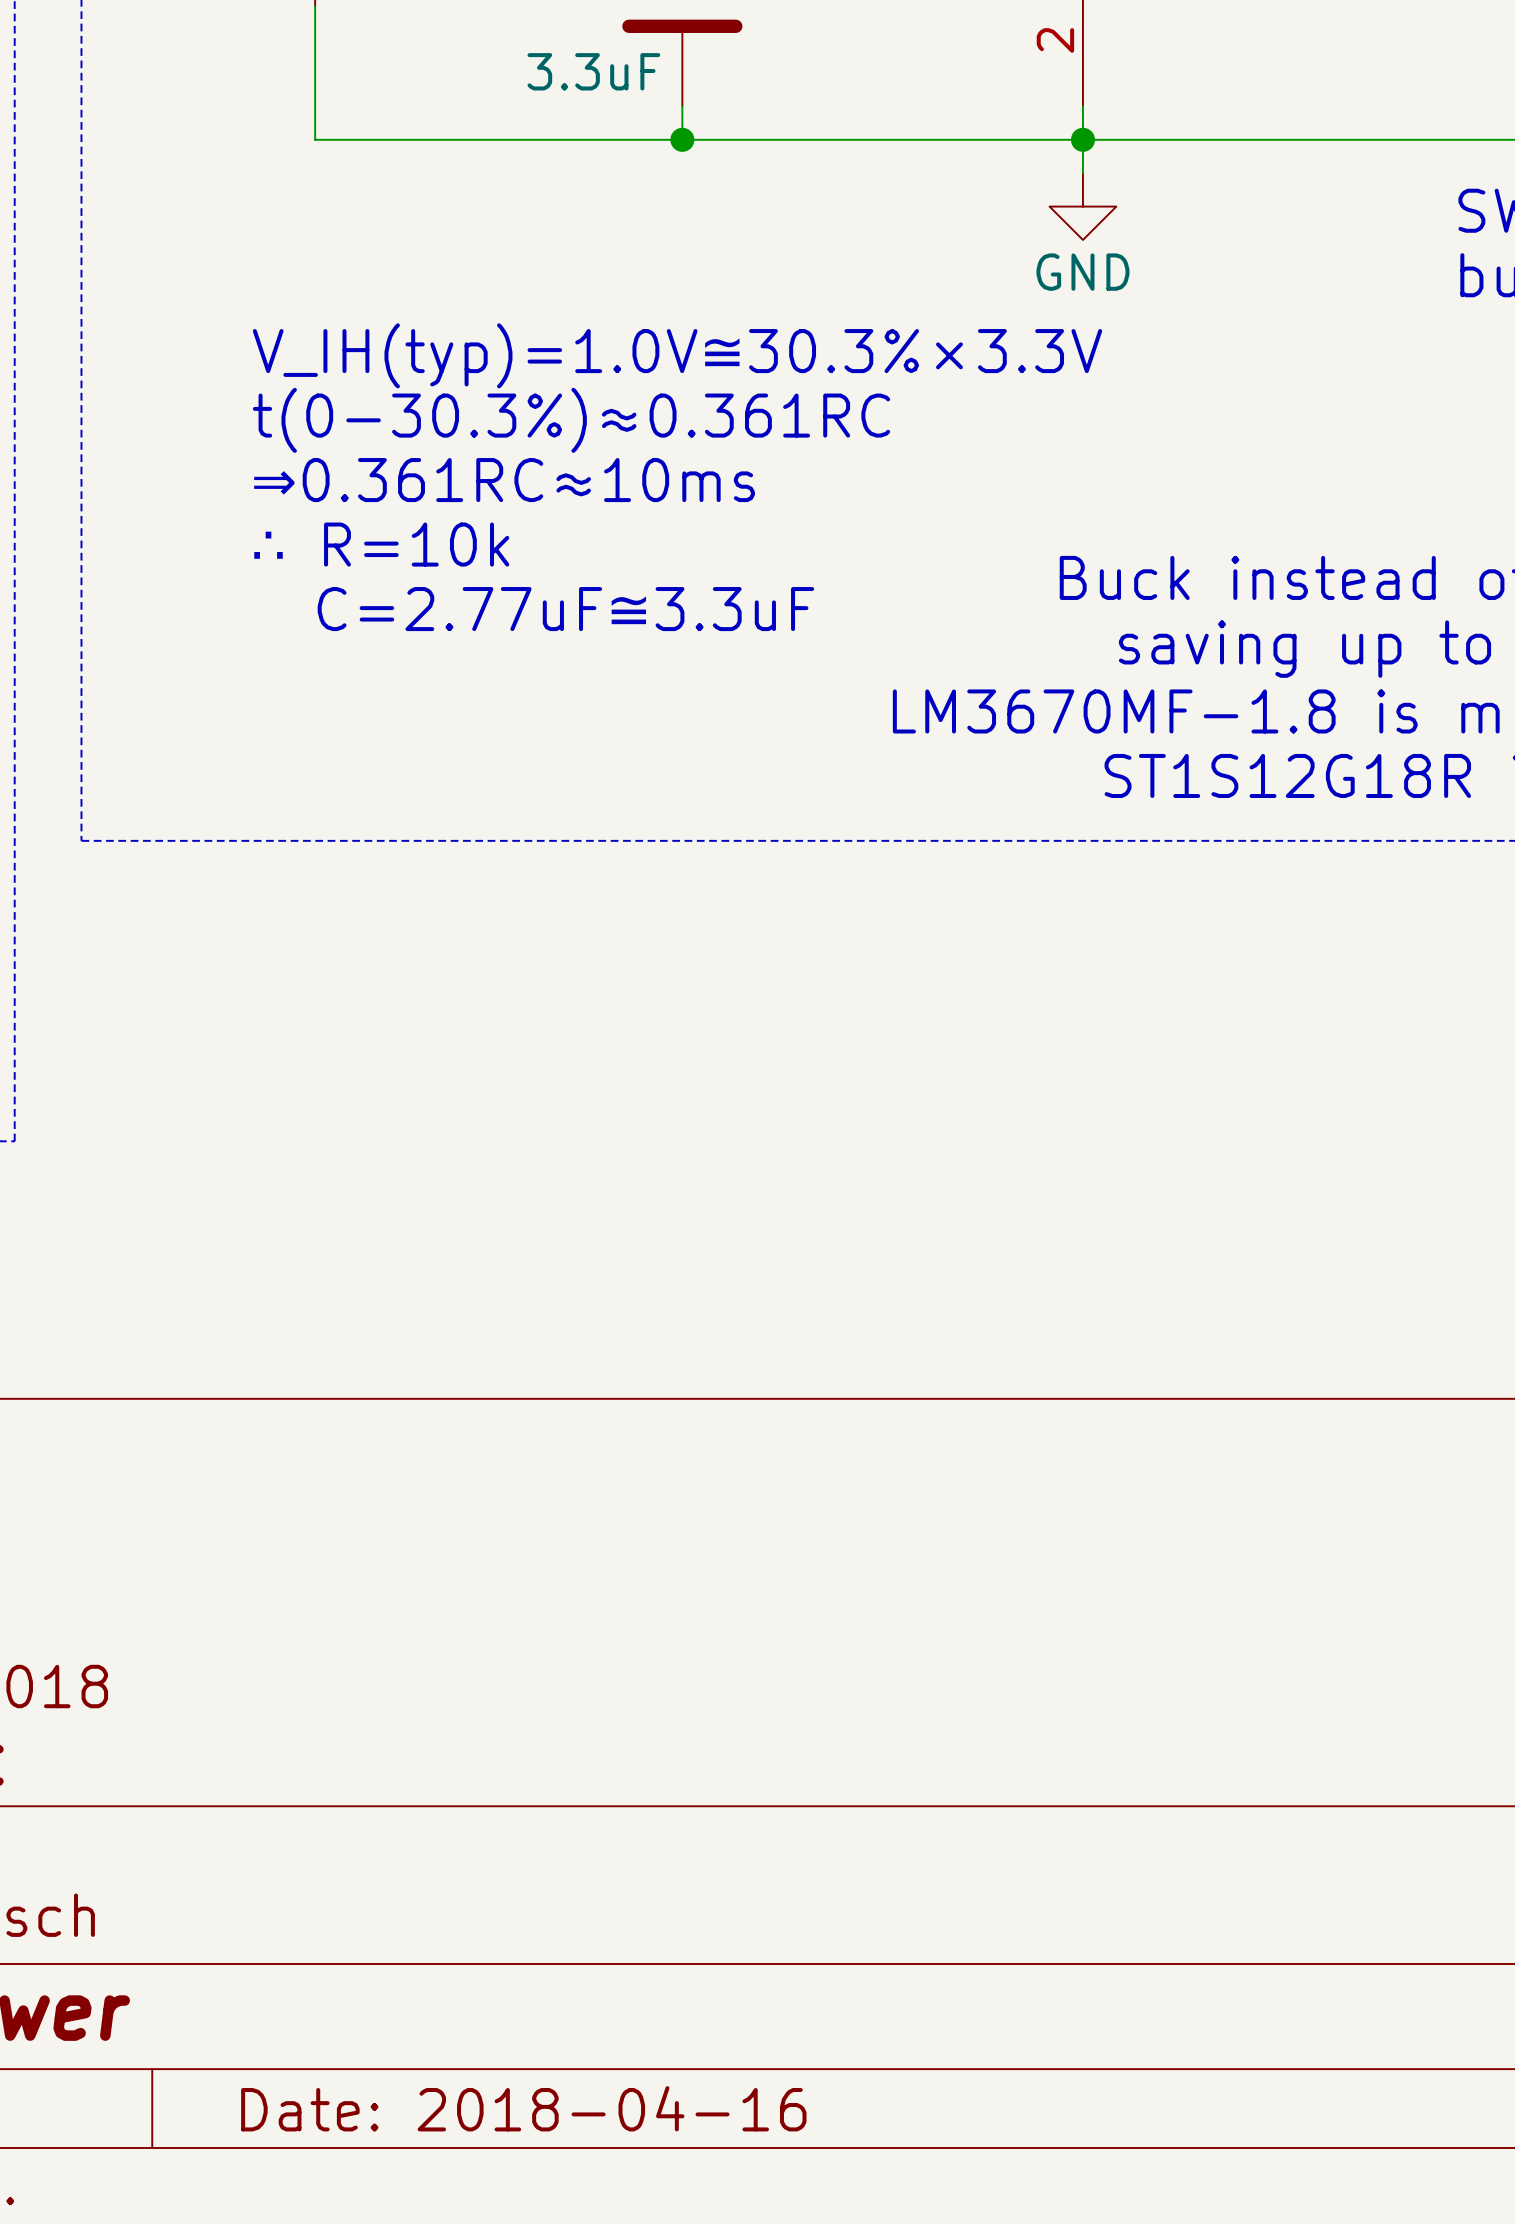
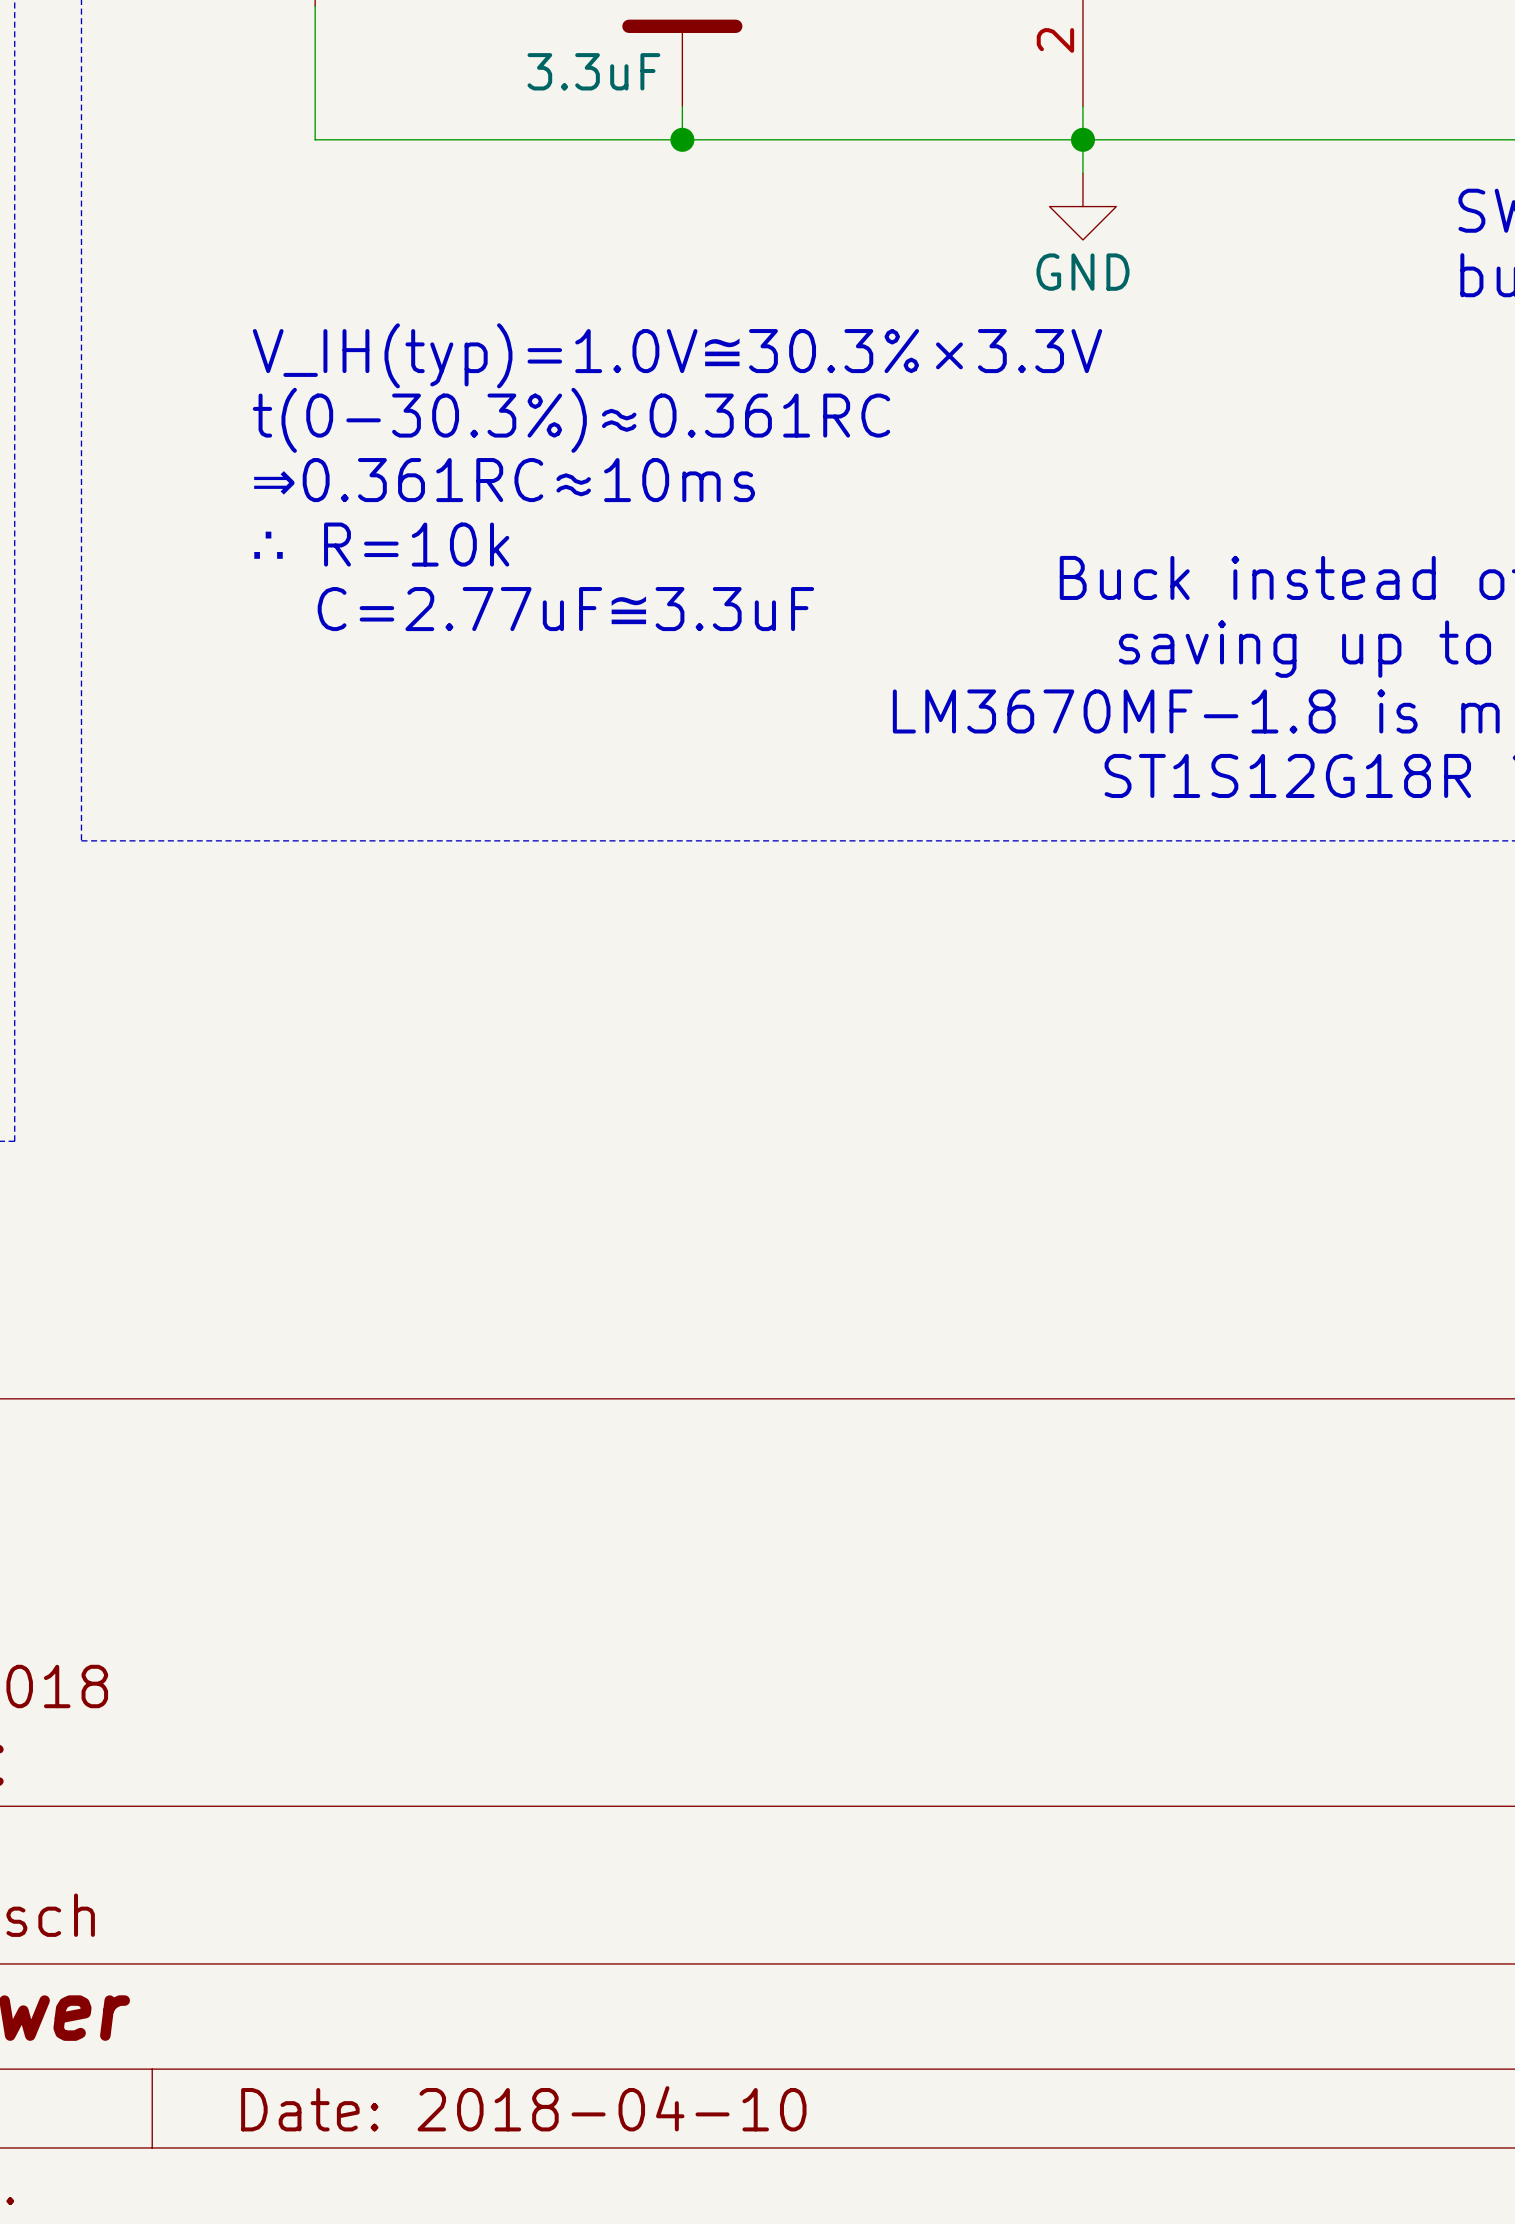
title block: Date: 2018-04-16 (523, 2108) -> Date: 2018-04-10 (523, 2108)

